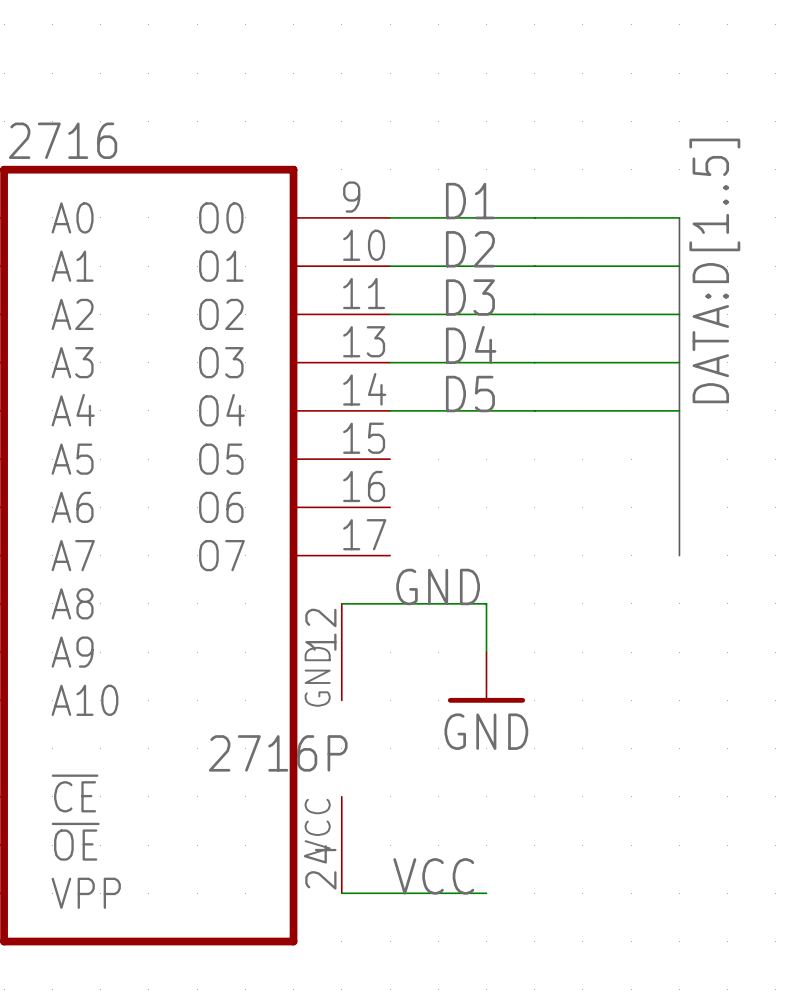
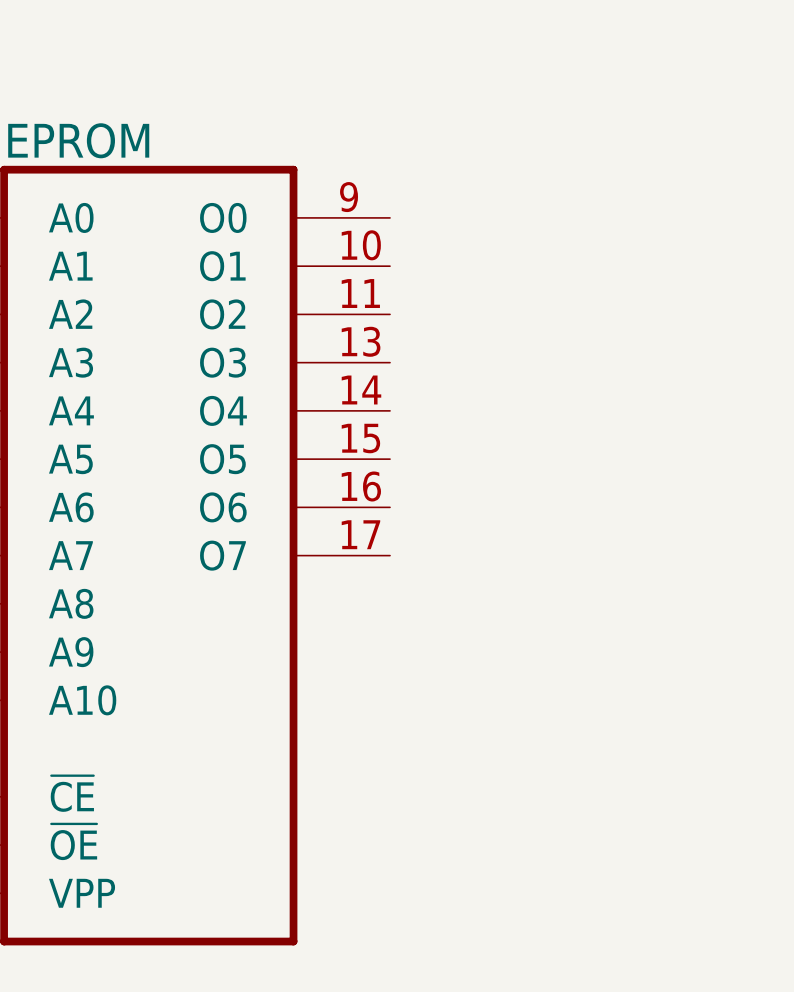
2716 name: 2716 (63, 140) -> EPROM (78, 140)
label: D1 (470, 201) -> none
wire: (390, 217) (679, 217) -> none
bus: (679, 217) (679, 555) -> none
label: D2 (470, 249) -> none
wire: (390, 266) (679, 266) -> none
label: DATA:D[1..5] (714, 270) -> none
label: D3 (470, 297) -> none
wire: (390, 314) (679, 314) -> none
label: D4 (471, 344) -> none
wire: (390, 362) (679, 362) -> none
label: D5 (470, 394) -> none
wire: (390, 410) (679, 410) -> none
label: GND (438, 586) -> none
wire: (341, 603) (486, 603) (486, 652) -> none
power symbol: GND (486, 677) -> none
2716P: (341, 748) -> none
label: VCC (433, 876) -> none
wire: (341, 893) (486, 893) -> none

